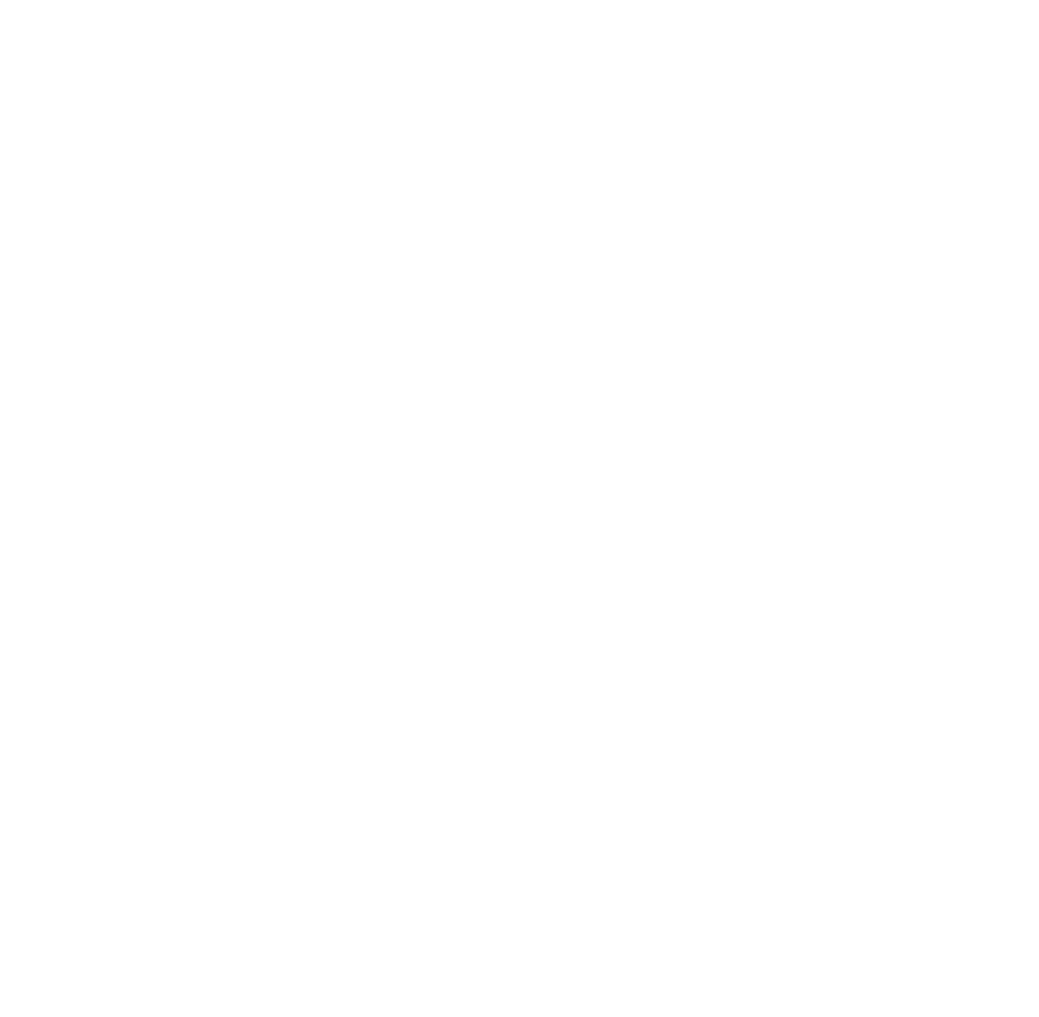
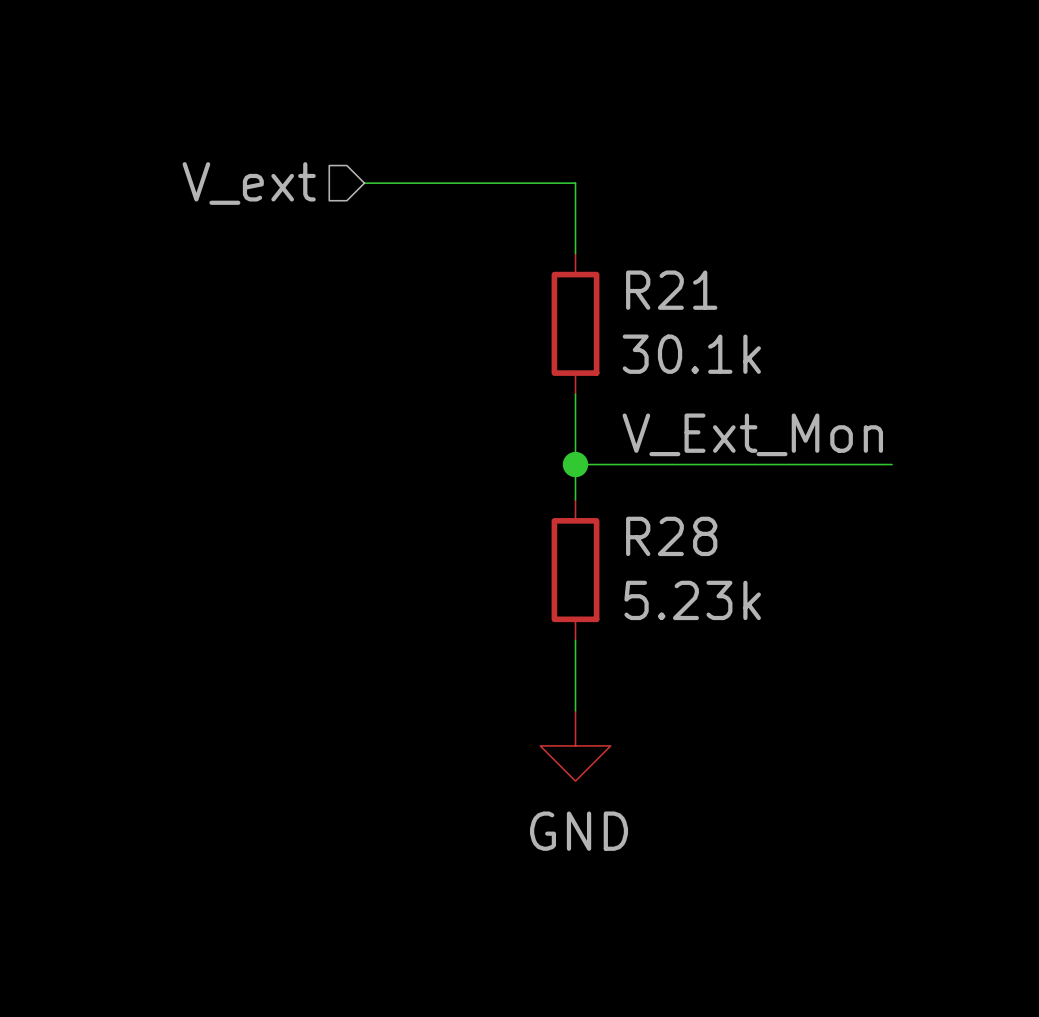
hierarchical label: none -> V_ext (249, 183)
wire: none -> (364, 183) (575, 183) (575, 253)
R21: none -> 30.1k (575, 323)
wire: none -> (575, 394) (575, 499)
label: none -> V_Ext_Mon (752, 434)
wire: none -> (575, 464) (892, 464)
junction: none -> (575, 464)
R28: none -> 5.23k (575, 570)
wire: none -> (575, 640) (575, 710)
power symbol: none -> GND (575, 745)

